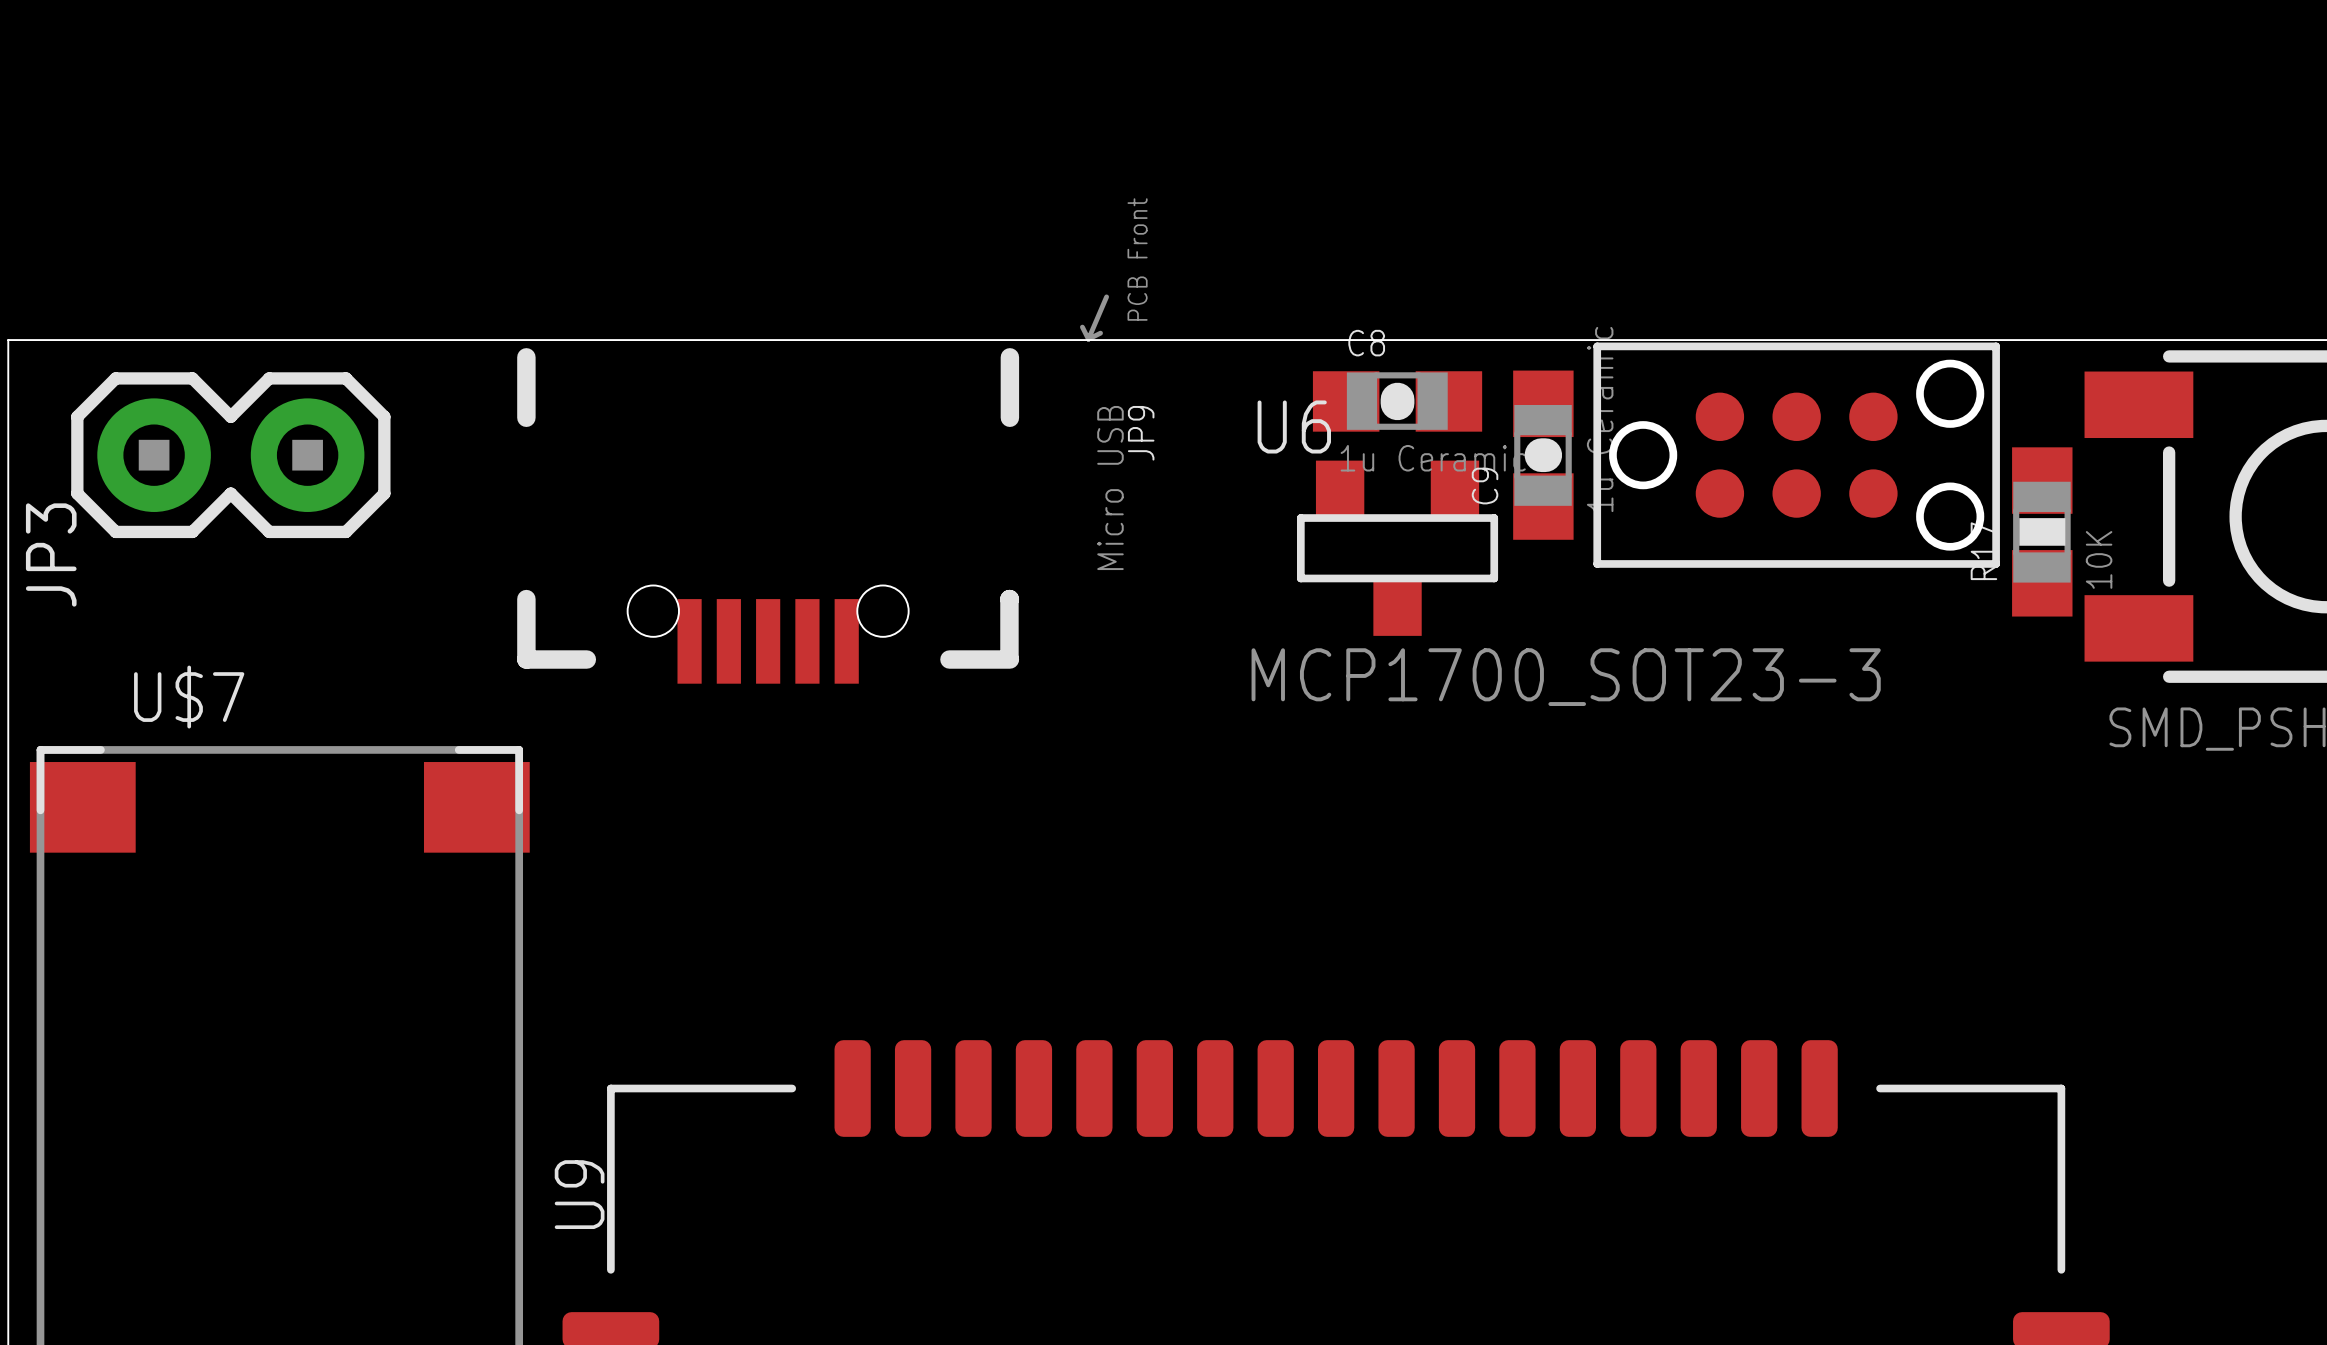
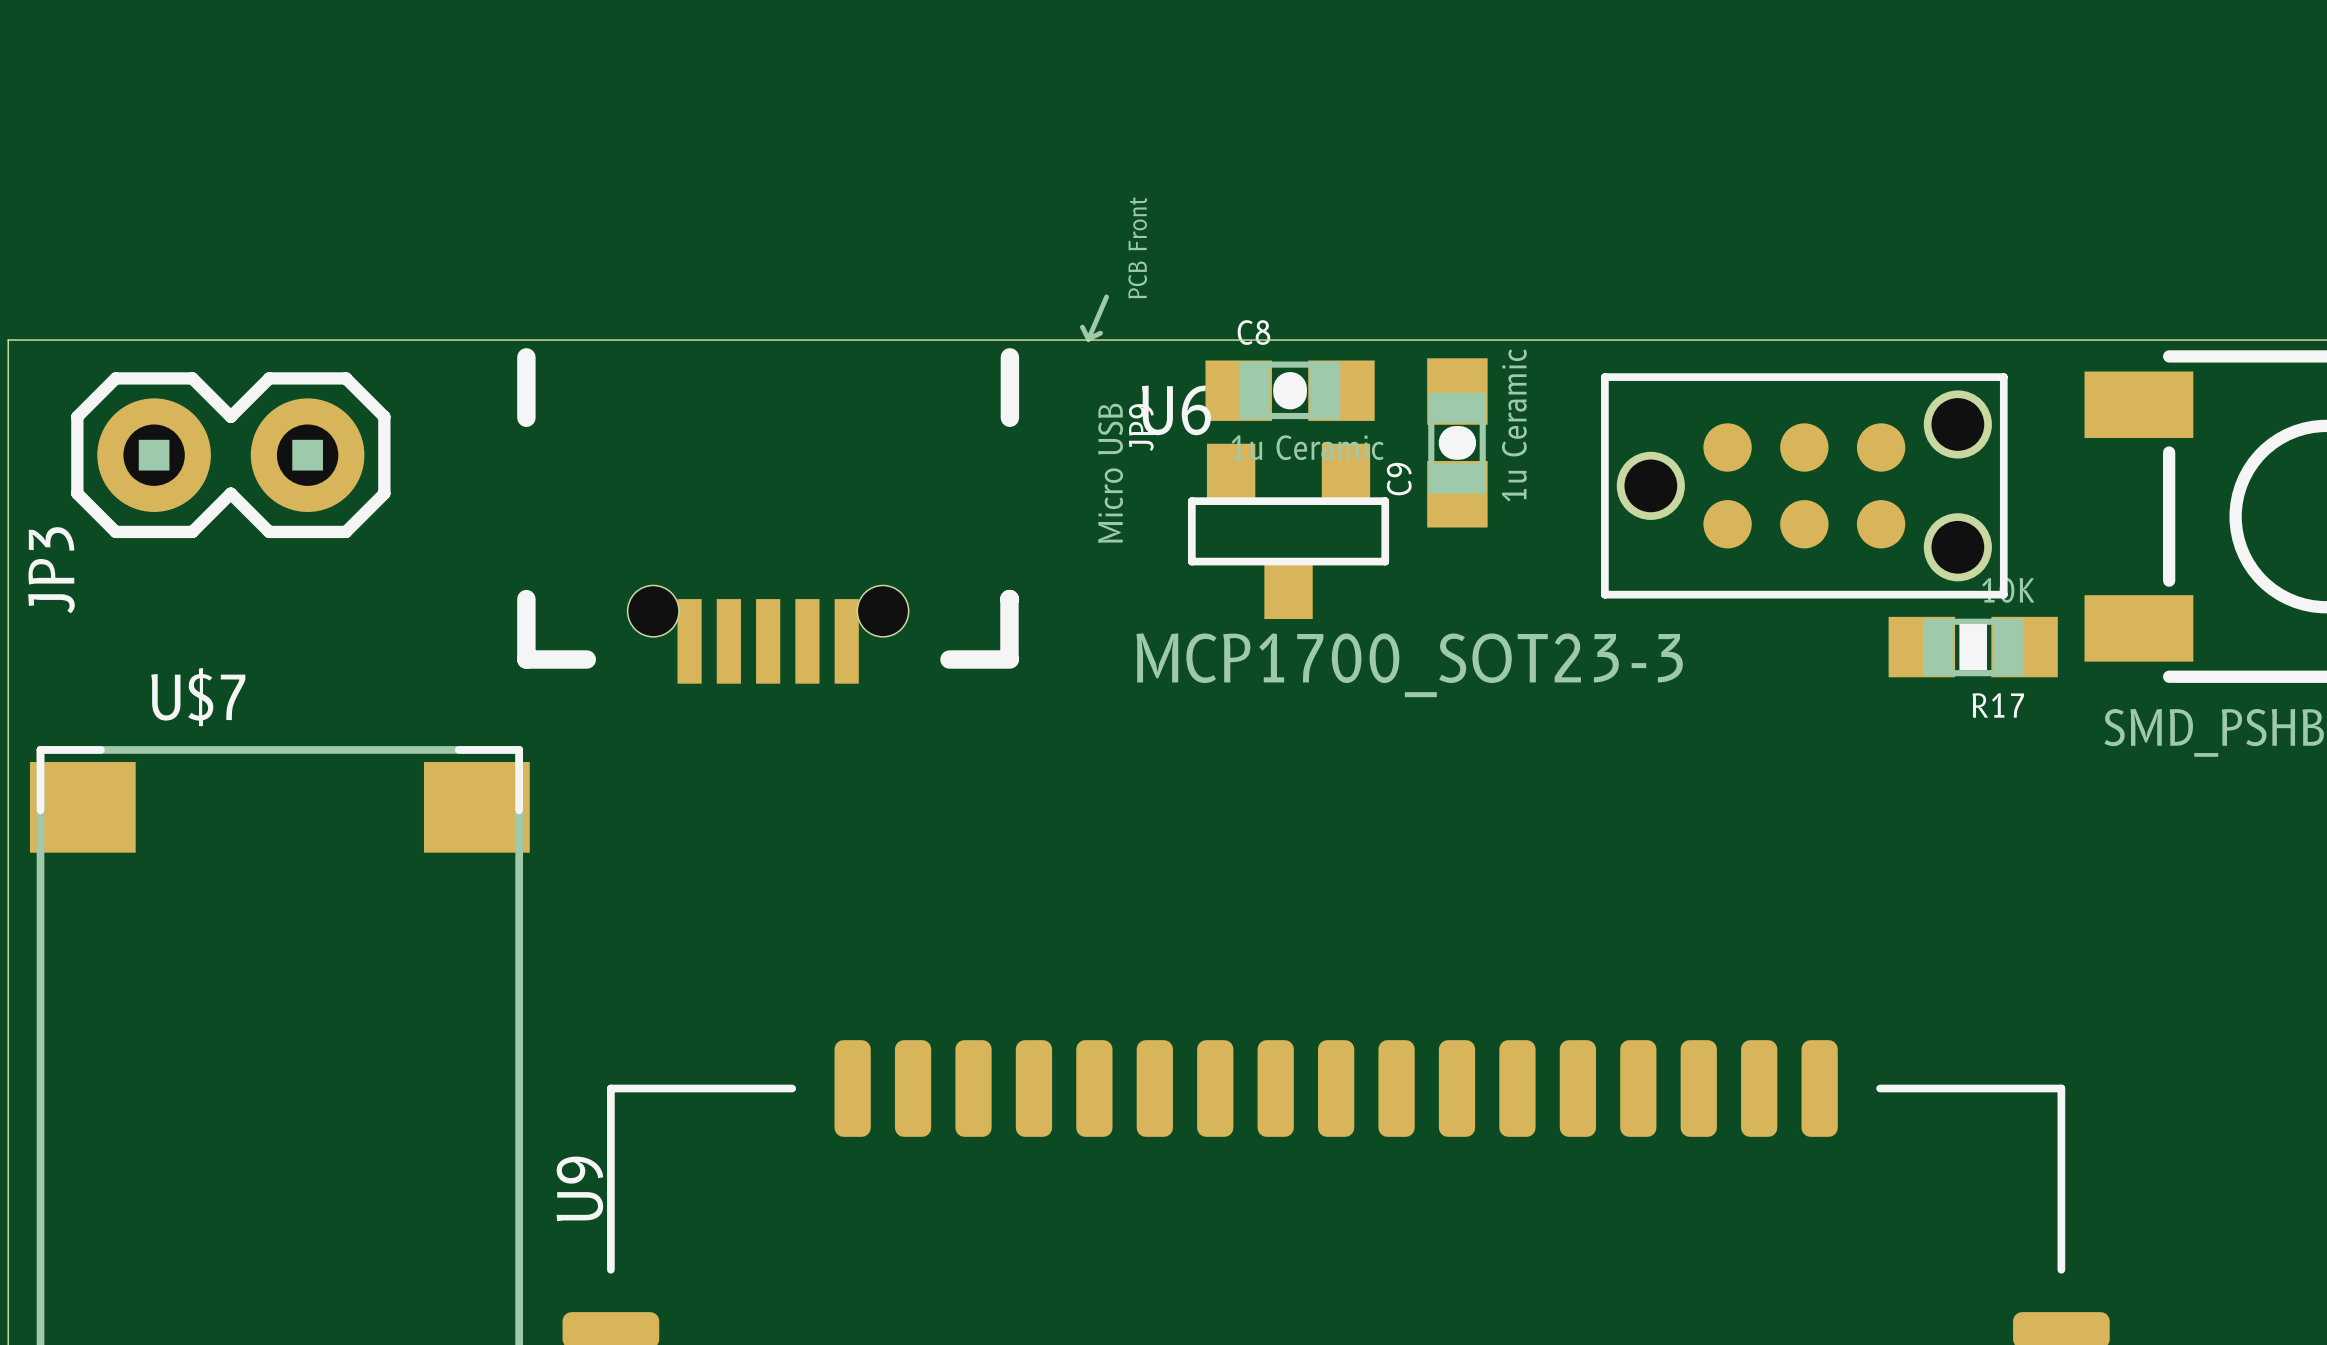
C8 position: (1397, 401) -> (1290, 390)
C9 position: (1543, 455) -> (1457, 442)
part position: (1796, 455) -> (1804, 485)
R17 rotation: 0° (2042, 531) -> 90° clockwise (1973, 647)
R17 position: (2042, 531) -> (1973, 647)
U6 position: (1397, 548) -> (1288, 531)

